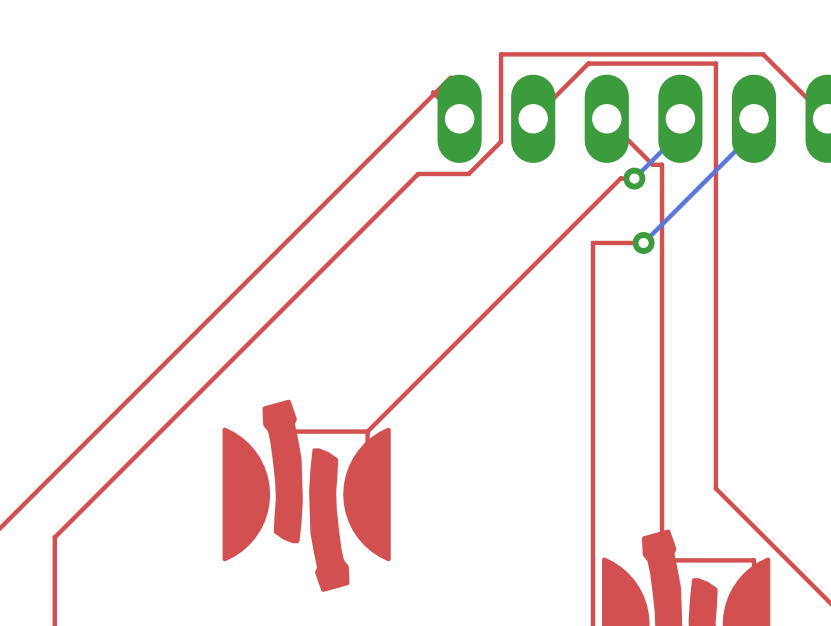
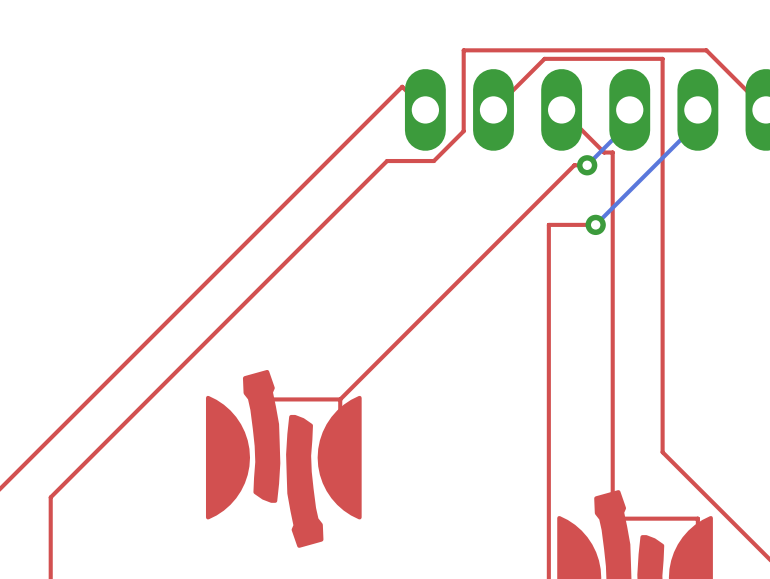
top track: (450, 77) (434, 93) (433, 92) -> none

